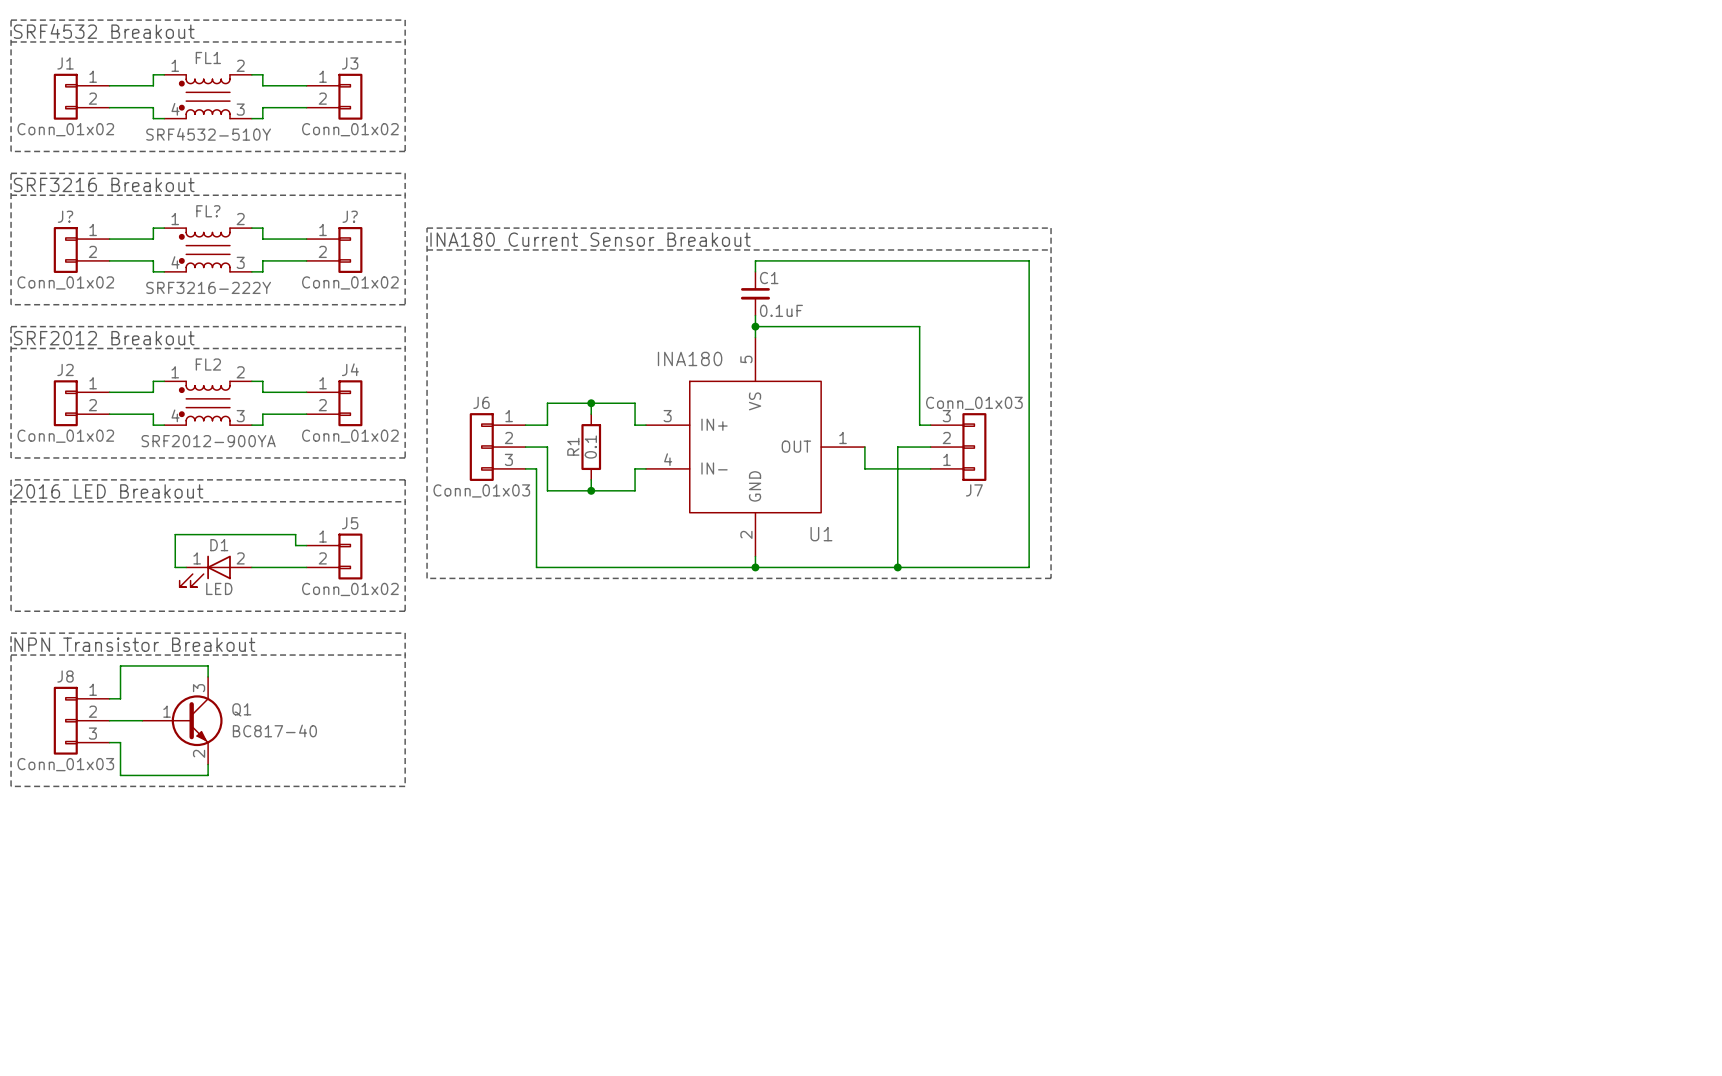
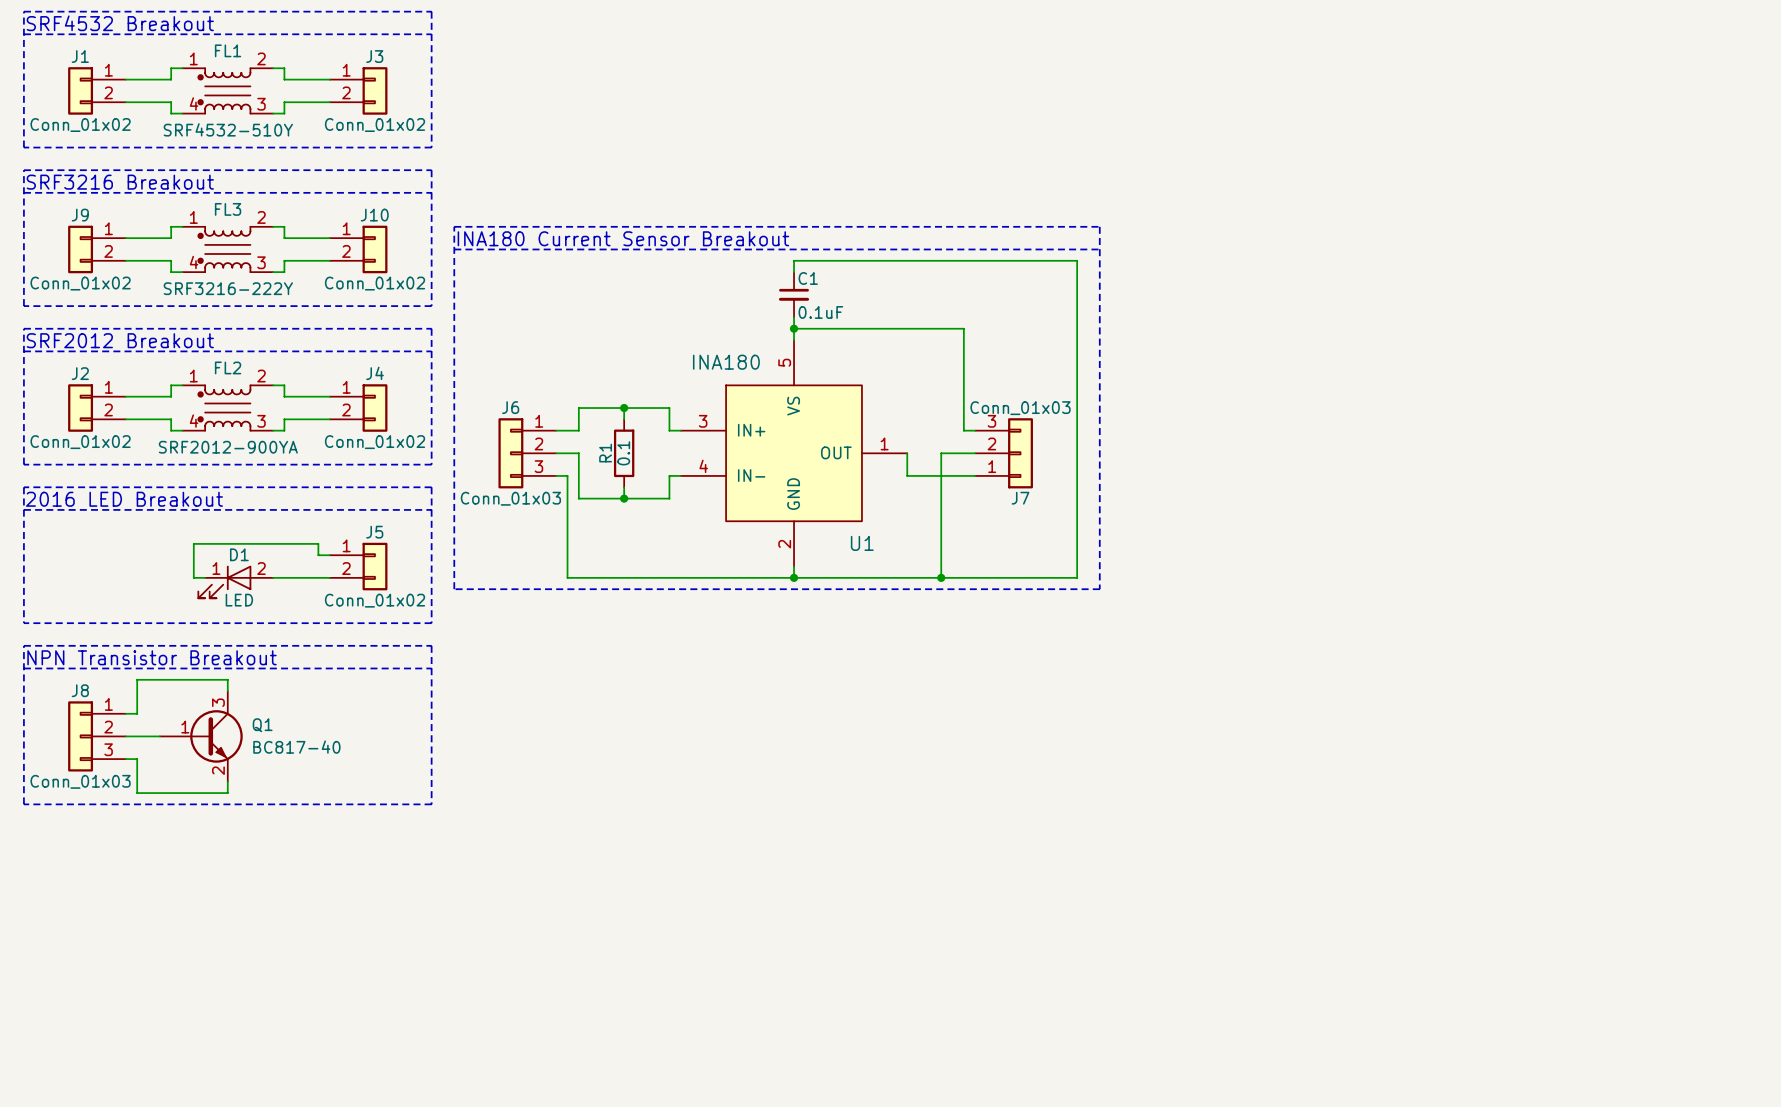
FL? name: FL? (208, 211) -> FL3 (228, 209)
J? name: J? (65, 216) -> J9 (80, 215)
J? name: J? (350, 216) -> J10 (374, 215)

